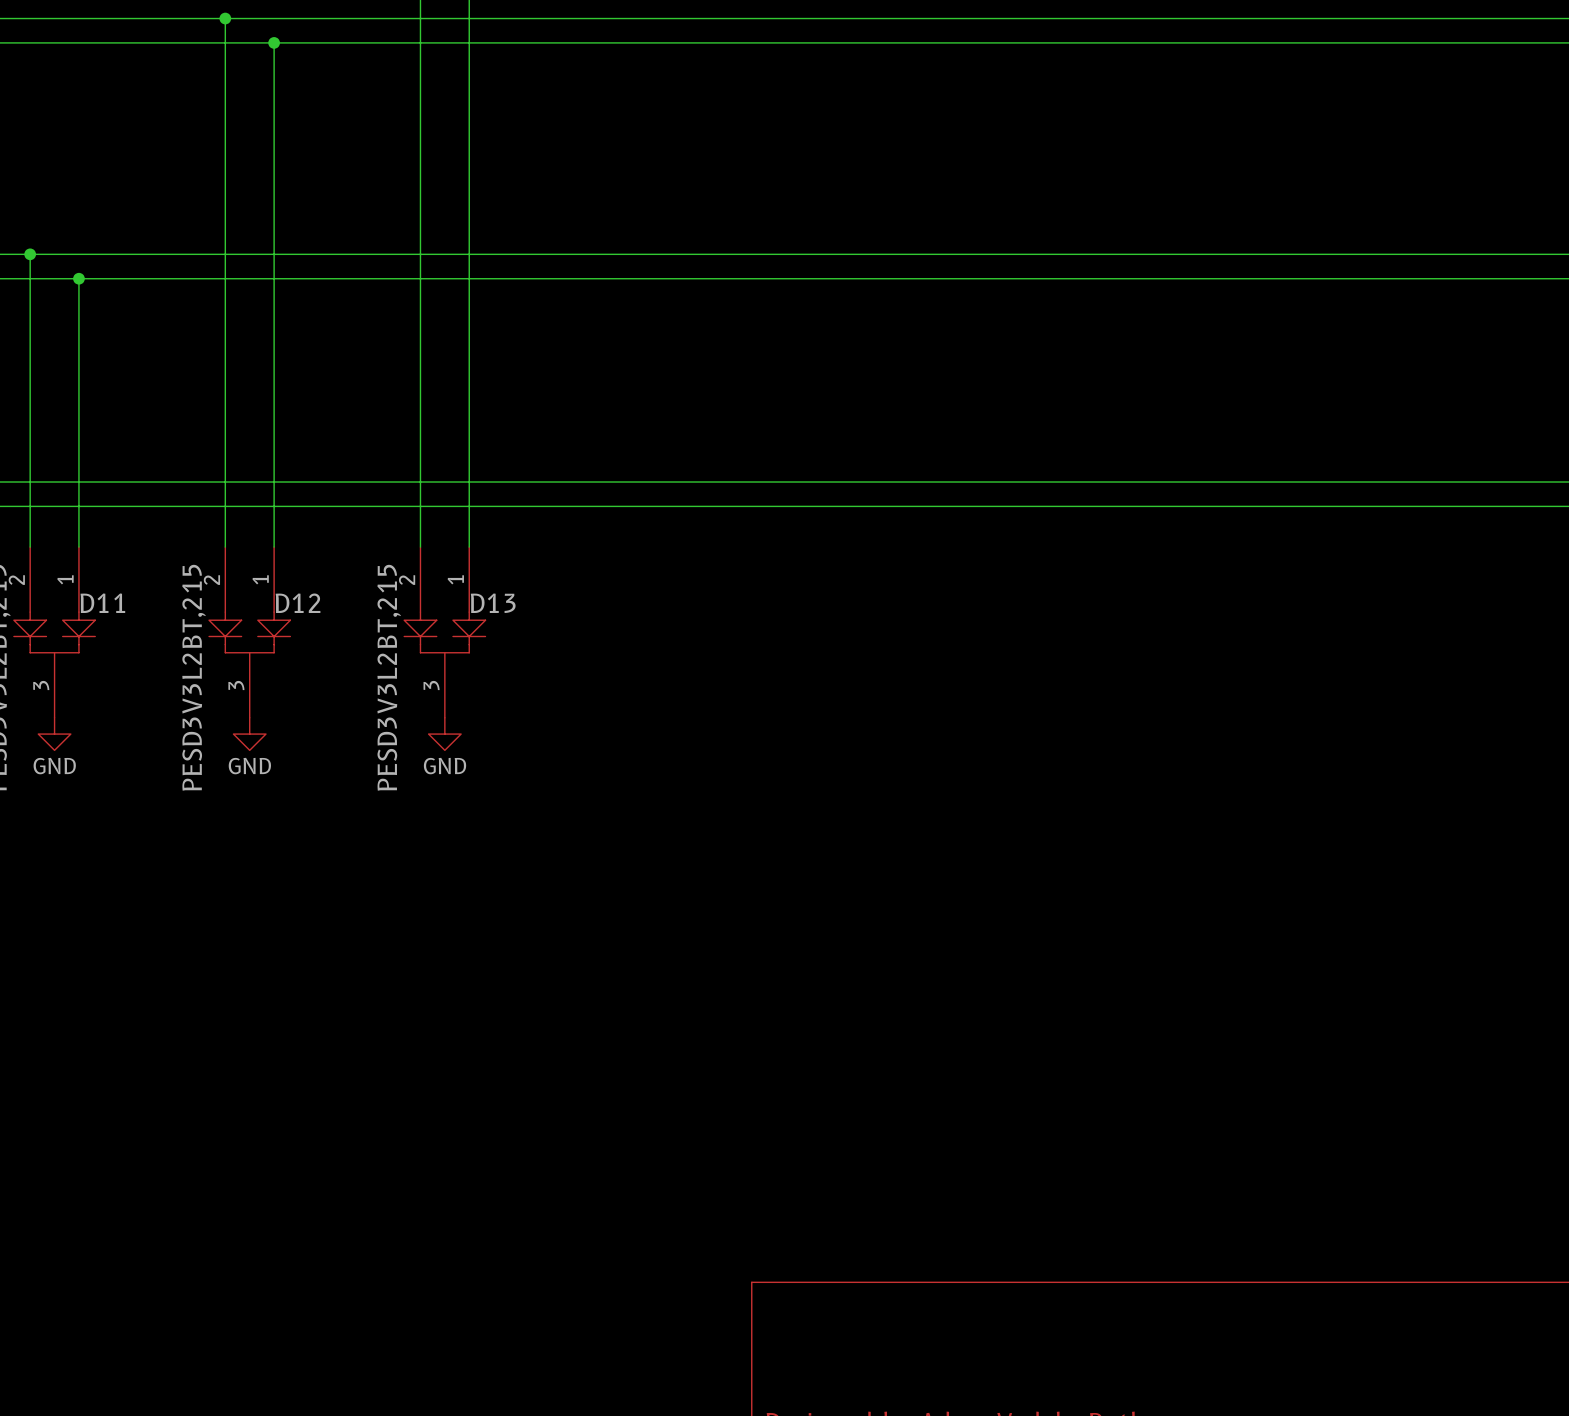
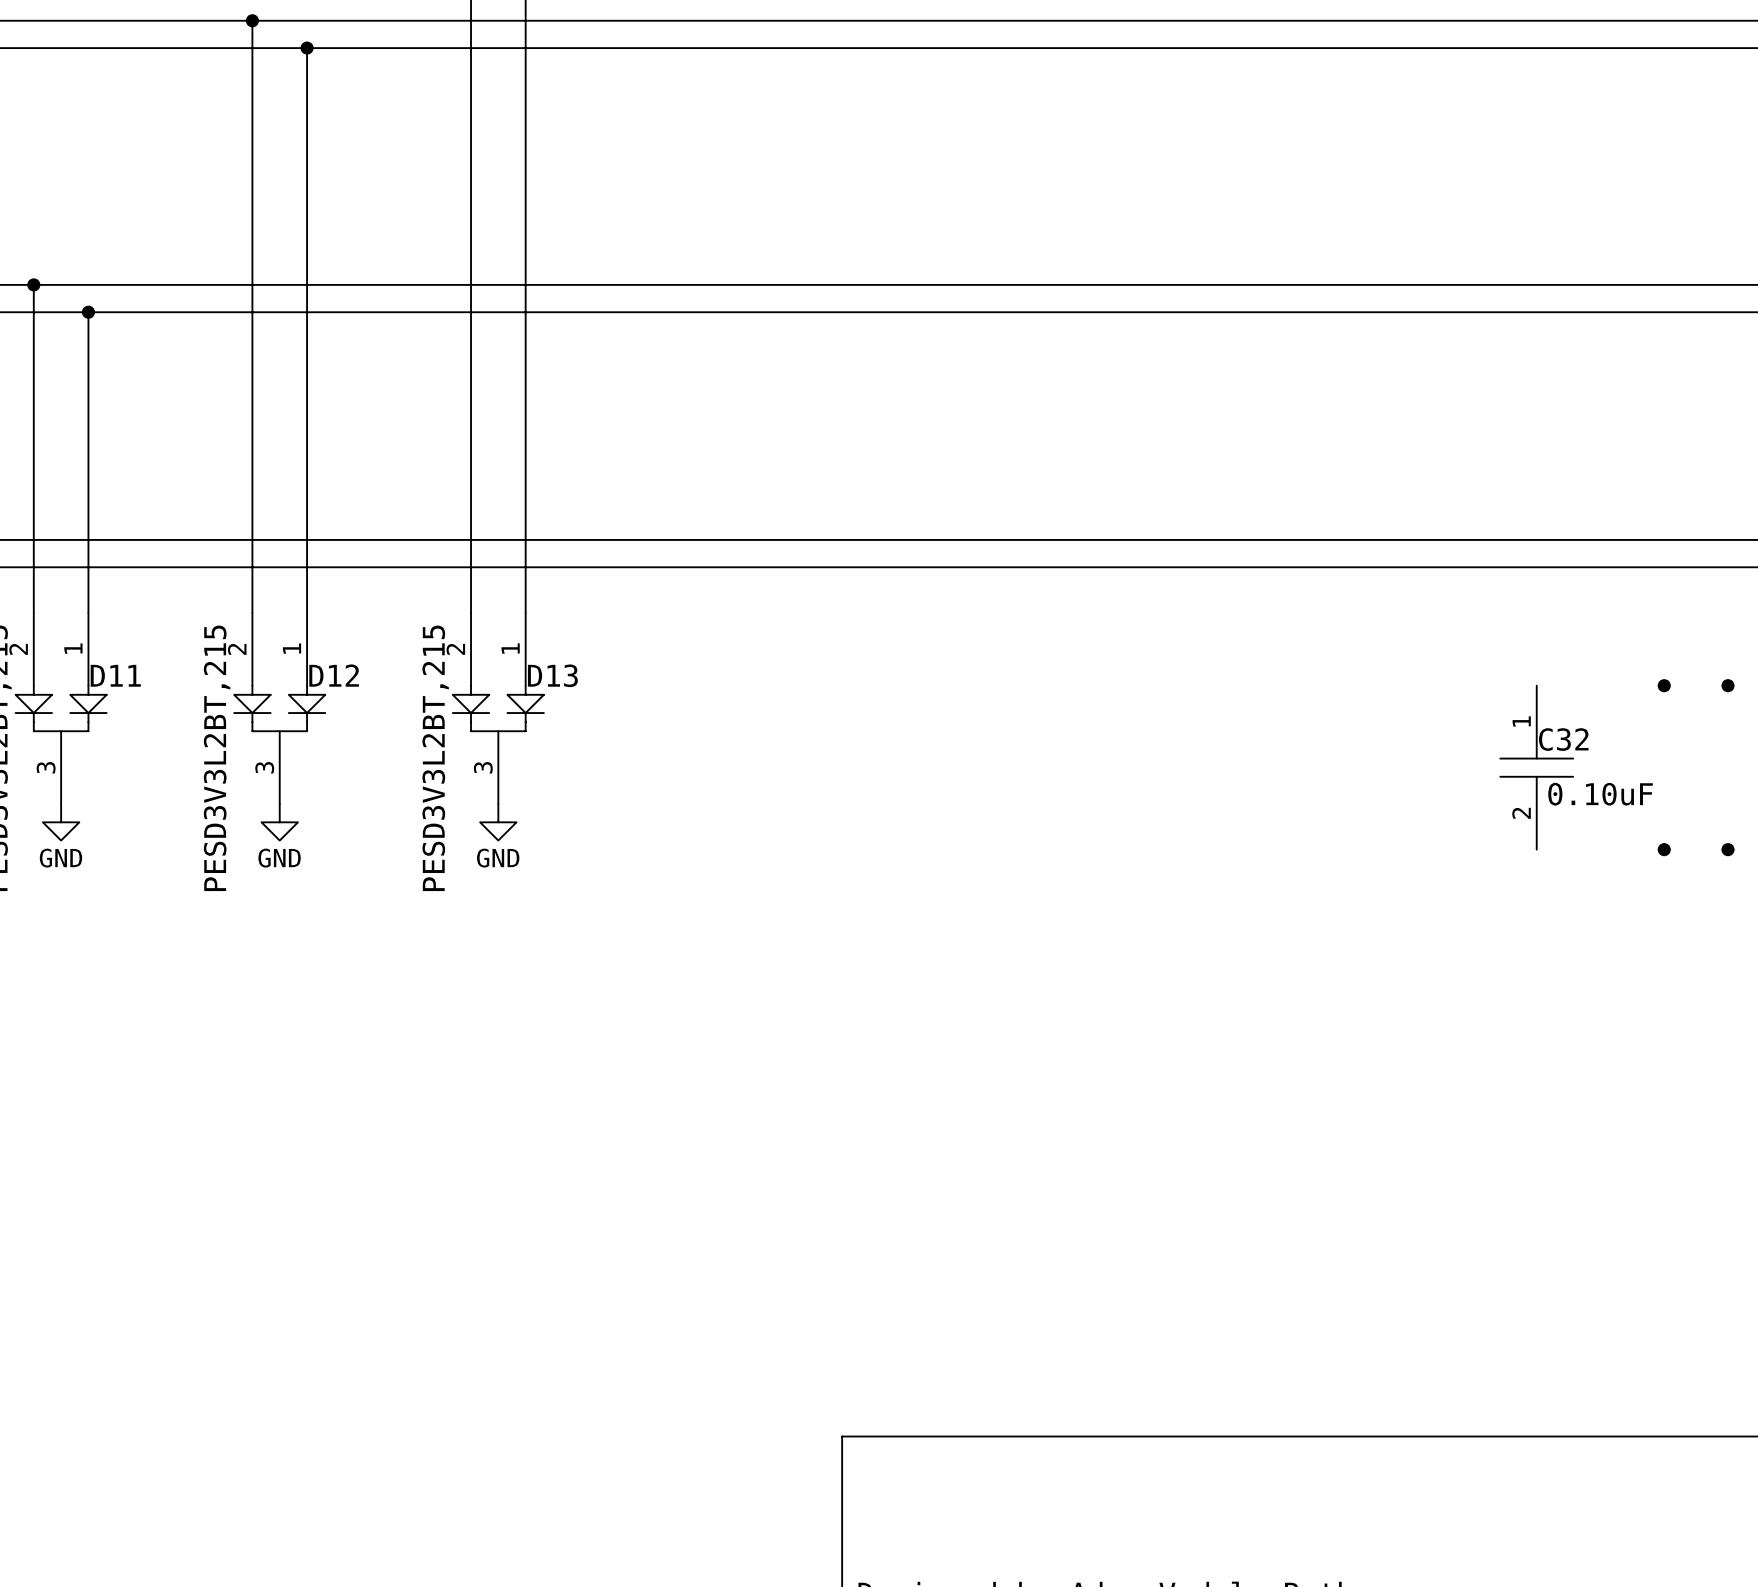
junction: none -> (1664, 685)
junction: none -> (1728, 685)
C32: none -> (1536, 767)
junction: none -> (1664, 849)
junction: none -> (1728, 849)

